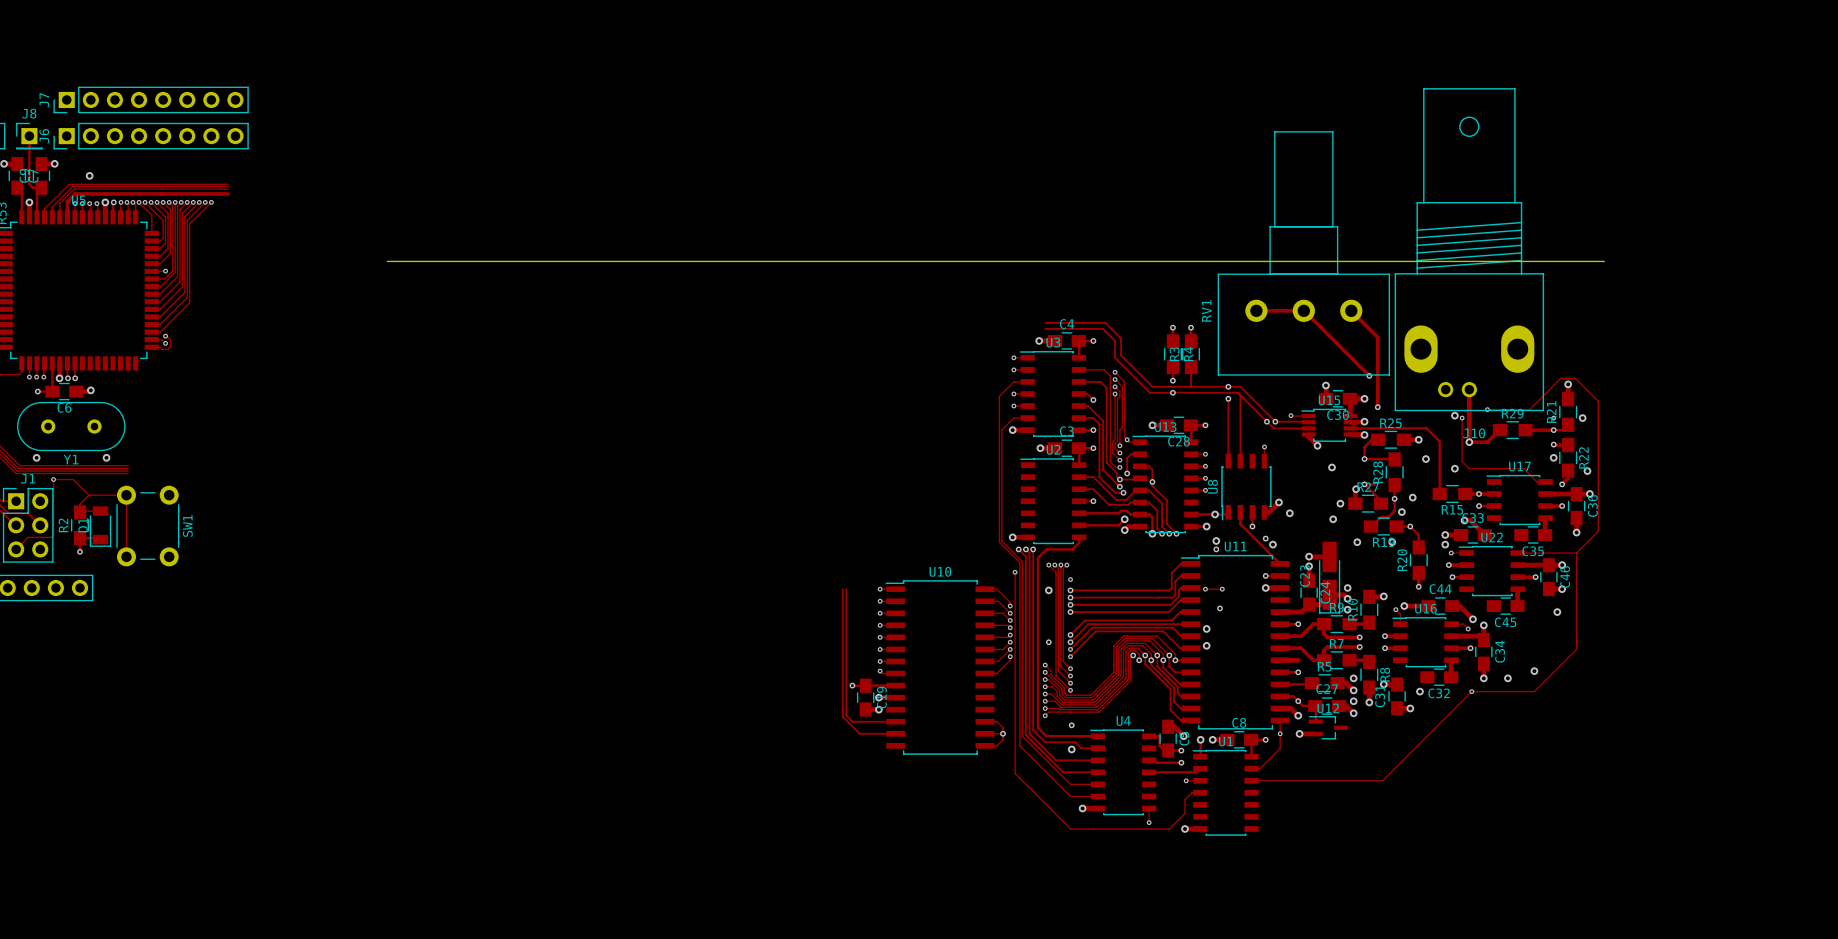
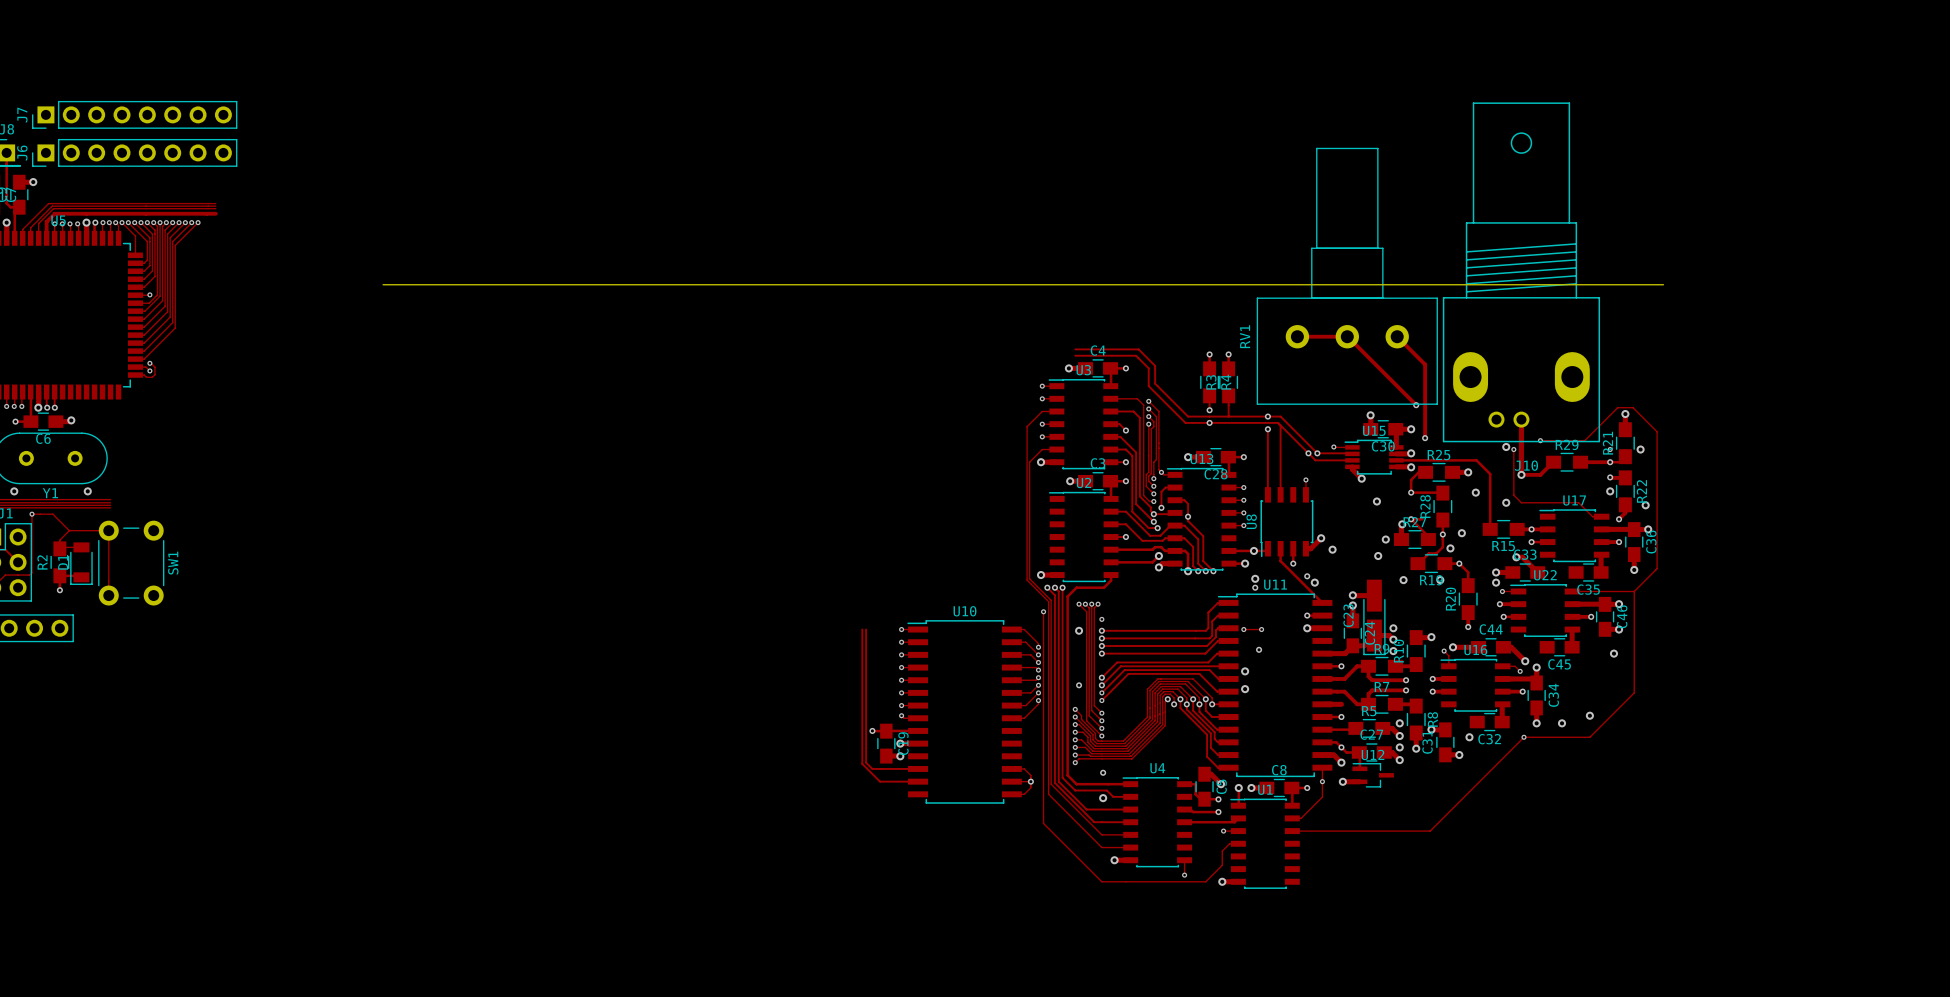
via: (89, 175) -> none

